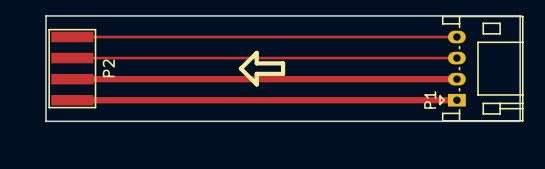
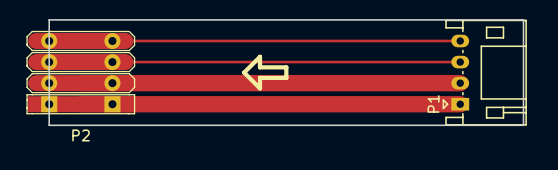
P2 footprint: [48, 28, 97, 109] -> [26, 30, 136, 115]
P2 name position: P2 (108, 68) -> P2 (81, 135)
track width: thin (77, 79) (456, 79) -> thick (80, 83) (460, 83)
track width: thin (77, 100) (456, 100) -> thick (80, 104) (460, 104)

